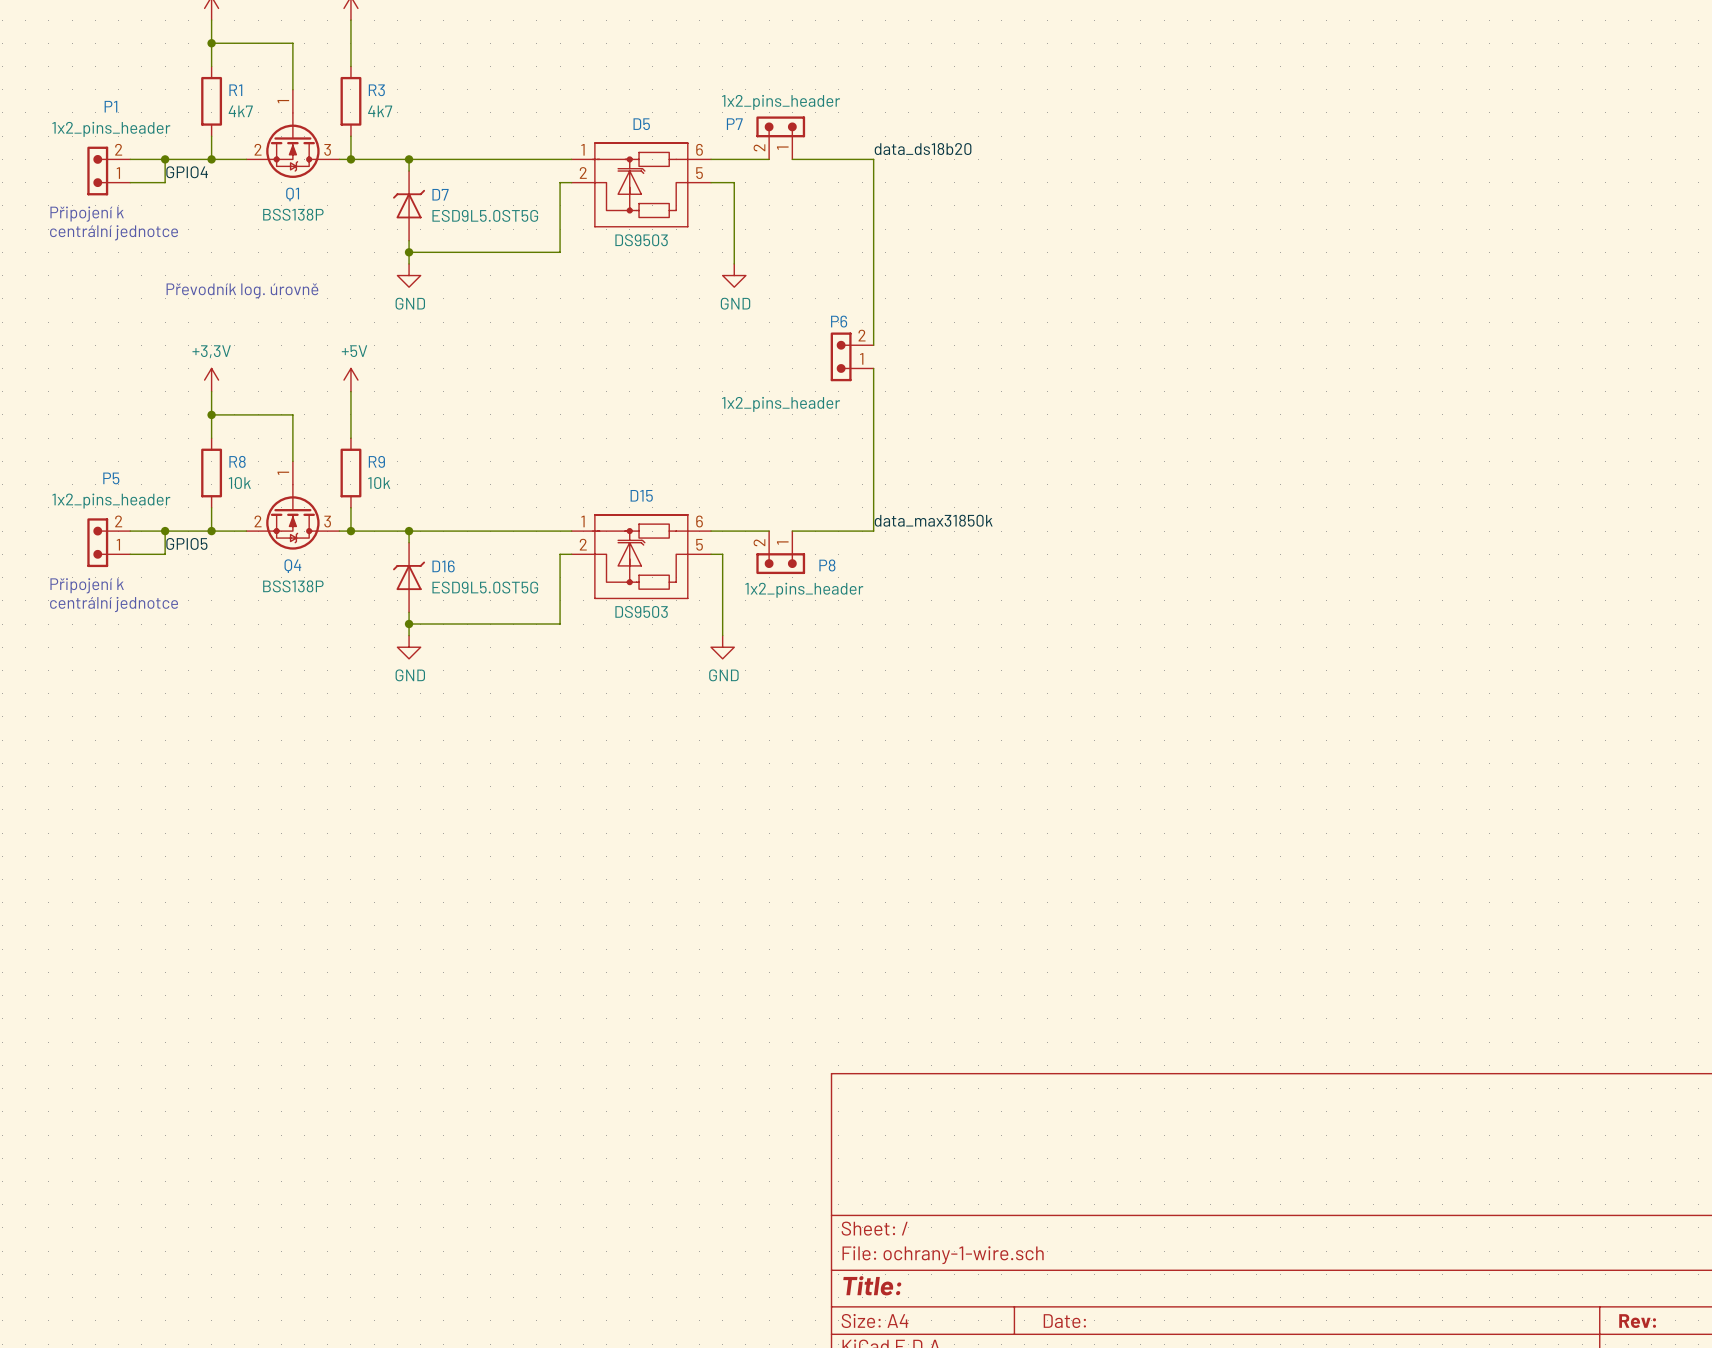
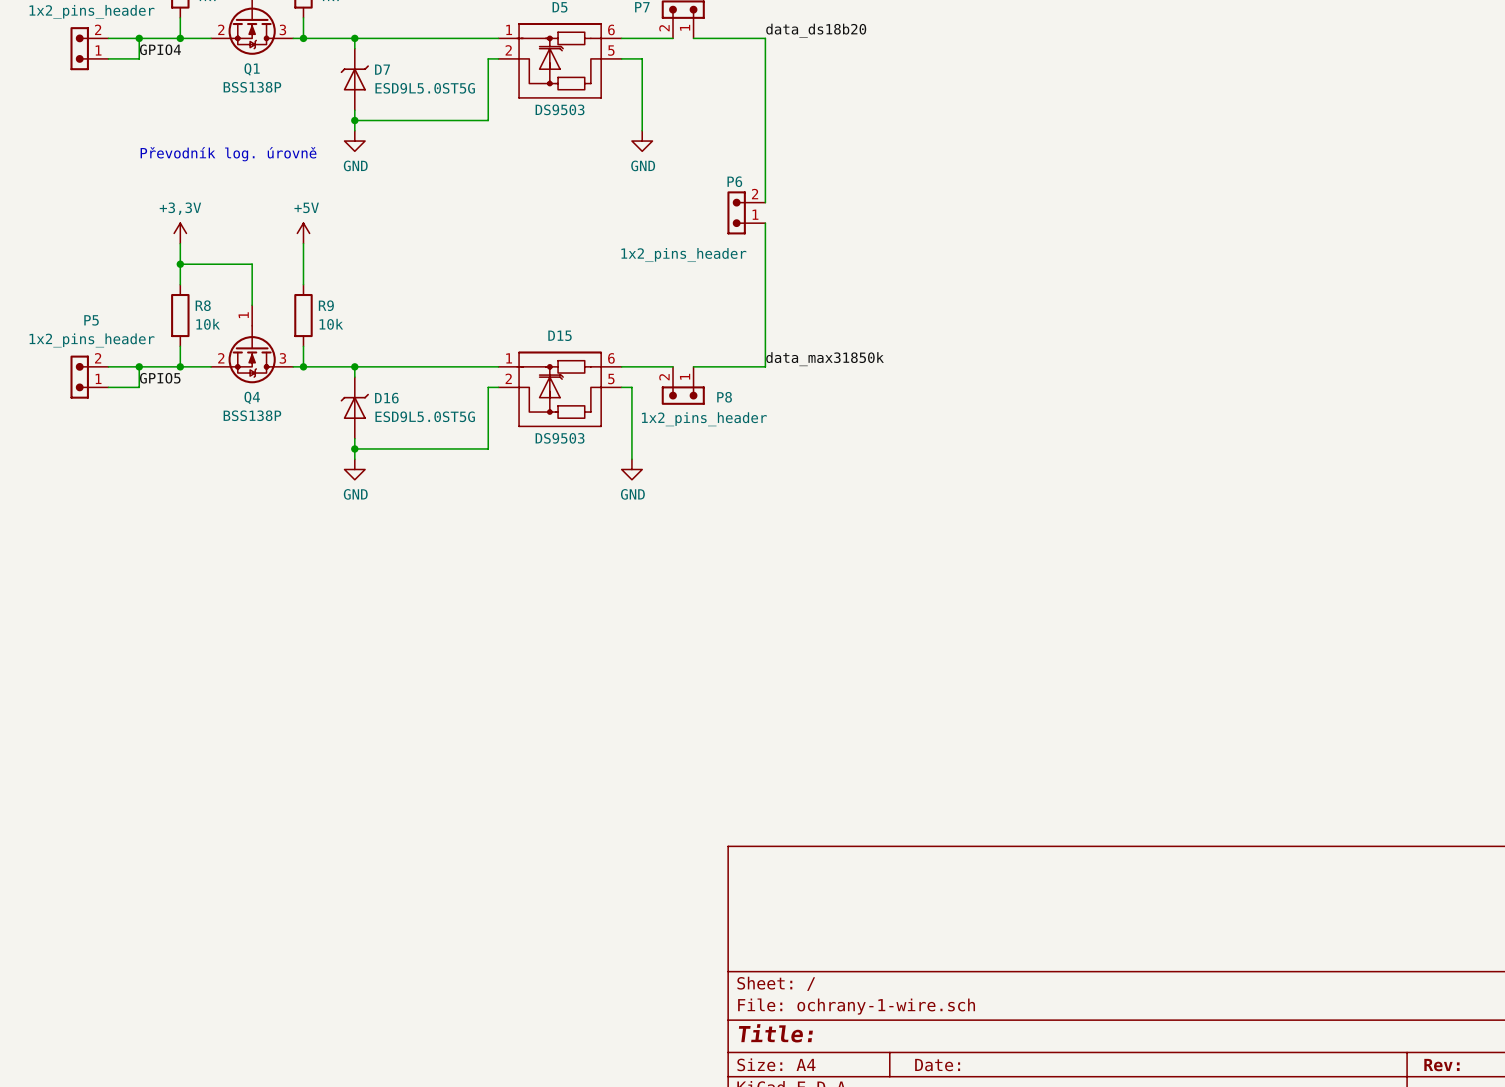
text: Připojení k (87, 214) -> none
text: centrální jednotce (114, 232) -> none
text: Připojení k (87, 585) -> none
text: centrální jednotce (114, 604) -> none

